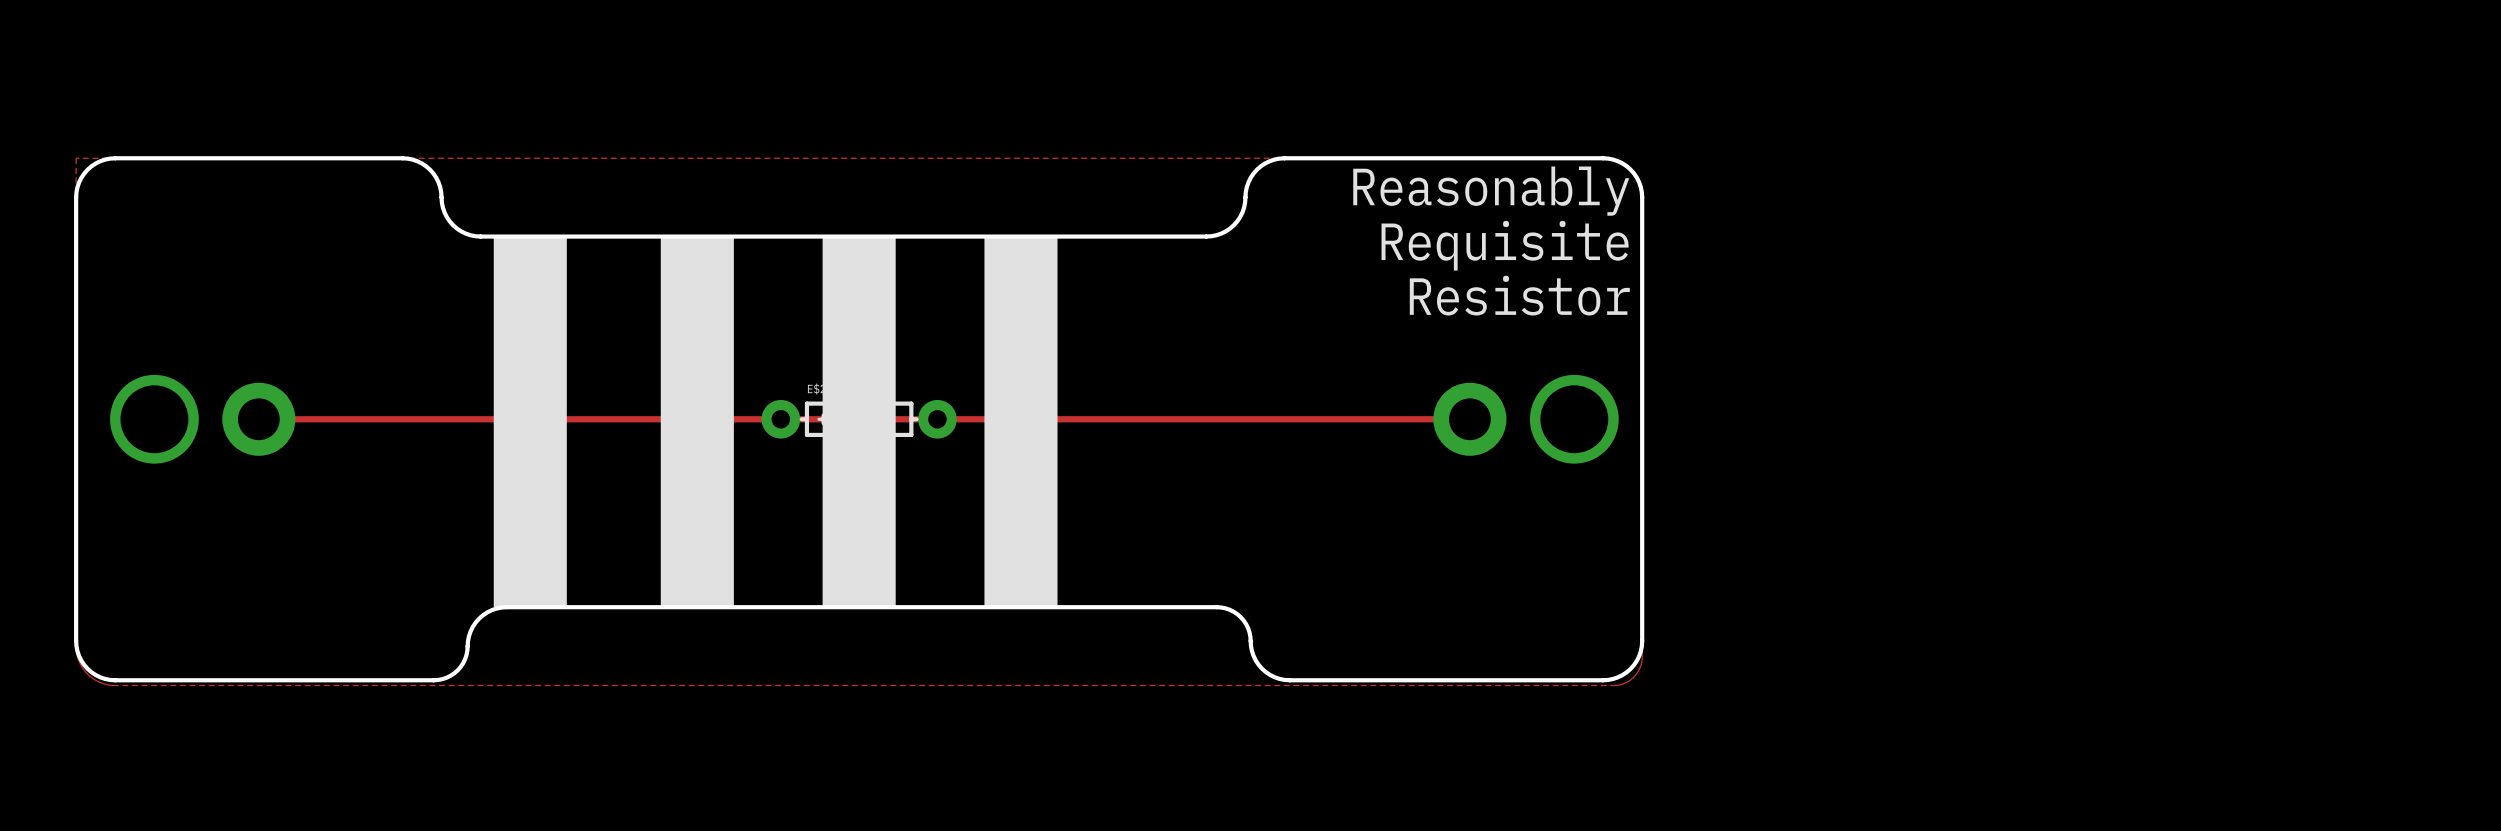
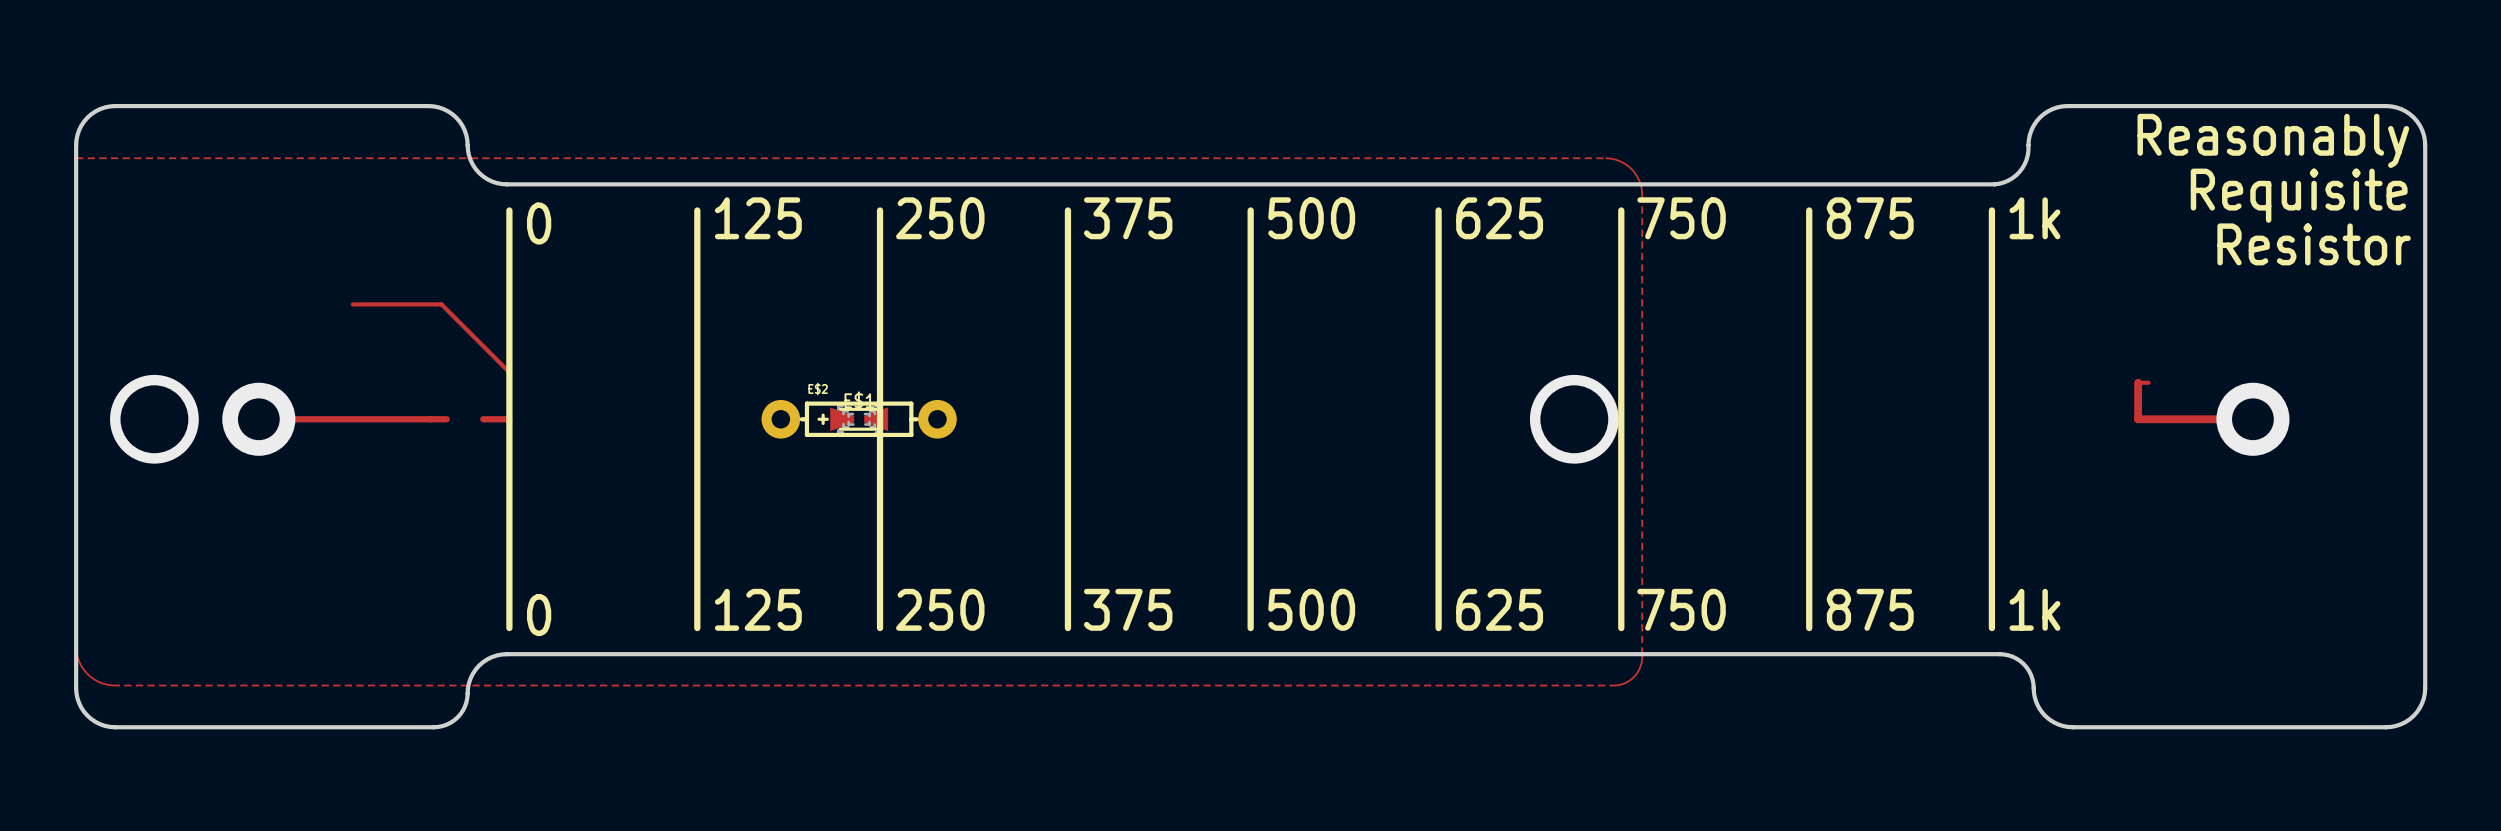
text: none -> Reasonably (2273, 140)
text: Reasonably (1491, 191) -> none
text: none -> Requisite (2299, 195)
board edge: (76, 197) (77, 187) (84, 173) (95, 163) (110, 158) (407, 158) (421, 163) (433, 173) (440, 187) (444, 212) (453, 225) (465, 233) (480, 236) (1211, 236) (1225, 231) (1237, 221) (1244, 207) (1248, 182) (1256, 169) (1269, 161) (1284, 158) (1608, 158) (1622, 163) (1634, 173) (1640, 187) (1642, 197) (1642, 641) (1640, 651) (1634, 664) (1622, 675) (1613, 678) (1284, 679) (1270, 675) (1258, 664) (1252, 651) (1248, 628) (1240, 617) (1229, 609) (1216, 607) (501, 607) (487, 612) (475, 622) (468, 636) (465, 659) (457, 670) (446, 677) (433, 680) (110, 679) (95, 675) (84, 664) (77, 651) (76, 641) -> (76, 197) (76, 145) (79, 130) (84, 121) (95, 111) (115, 106) (438, 107) (452, 114) (462, 125) (466, 135) (470, 160) (479, 172) (491, 181) (506, 184) (1994, 184) (2012, 178) (2022, 168) (2027, 154) (2031, 130) (2039, 117) (2052, 109) (2067, 106) (2391, 106) (2405, 111) (2417, 121) (2423, 135) (2425, 145) (2425, 688) (2423, 698) (2417, 711) (2405, 722) (2396, 725) (2067, 726) (2053, 722) (2041, 711) (2035, 698) (2031, 675) (2023, 664) (2012, 656) (1999, 654) (506, 654) (491, 657) (479, 665) (470, 678) (463, 710) (454, 720) (438, 726) (115, 727) (95, 722) (84, 711) (79, 703) (76, 688) (76, 641)
line: none -> (509, 210) (509, 628)
line: none -> (697, 210) (697, 628)
line: none -> (880, 210) (880, 628)
line: none -> (1067, 210) (1067, 628)
line: none -> (1250, 210) (1250, 628)
line: none -> (1438, 210) (1438, 628)
line: none -> (1621, 210) (1621, 628)
line: none -> (1809, 210) (1809, 628)
line: none -> (1991, 210) (1991, 628)
text: none -> 1k (2034, 218)
text: none -> 125 (758, 218)
text: none -> 250 (940, 218)
text: none -> 375 (1128, 218)
text: none -> 500 (1311, 218)
text: none -> 625 (1499, 218)
text: none -> 750 (1681, 218)
text: none -> 875 (1870, 218)
text: none -> 0 (539, 223)
drawing: [493, 236, 567, 608] -> none
drawing: [660, 236, 734, 608] -> none
drawing: [822, 236, 896, 608] -> none
drawing: [984, 236, 1058, 608] -> none
text: none -> Resistor (2314, 244)
text: Requisite (1505, 245) -> none
text: Resistor (1519, 295) -> none
track: none -> (2148, 382) (2138, 382) (2138, 419) (2252, 419)
track: (446, 419) (483, 419) -> none
track: (509, 419) (840, 419) -> (509, 419) (509, 372) (441, 304) (352, 304)
track: (880, 419) (1469, 419) -> none
via: (1469, 419) -> none
via: none -> (2252, 419)
text: none -> 1k (2034, 609)
text: none -> 125 (758, 609)
text: none -> 250 (940, 609)
text: none -> 375 (1128, 609)
text: none -> 500 (1311, 609)
text: none -> 625 (1499, 609)
text: none -> 750 (1681, 609)
text: none -> 875 (1870, 609)
text: none -> 0 (539, 615)

